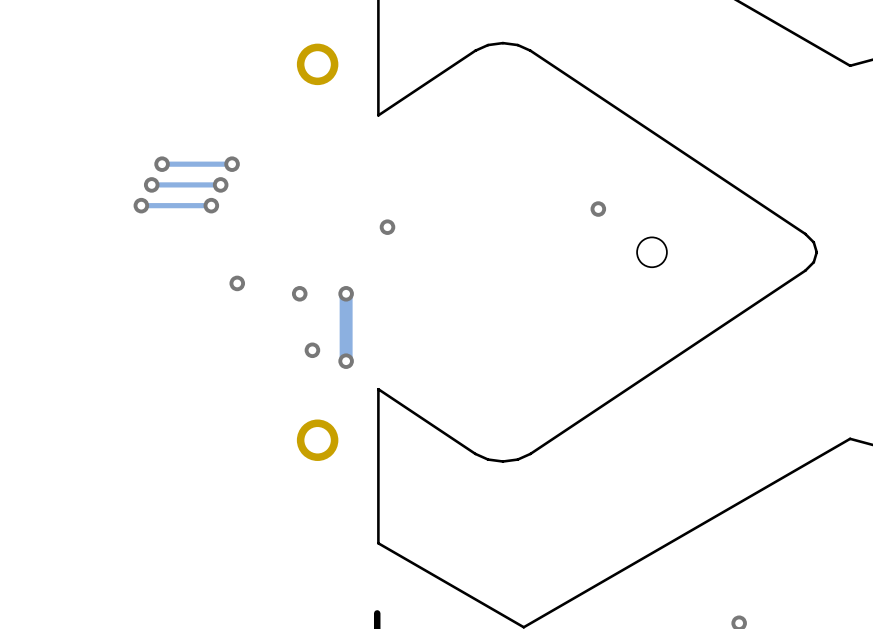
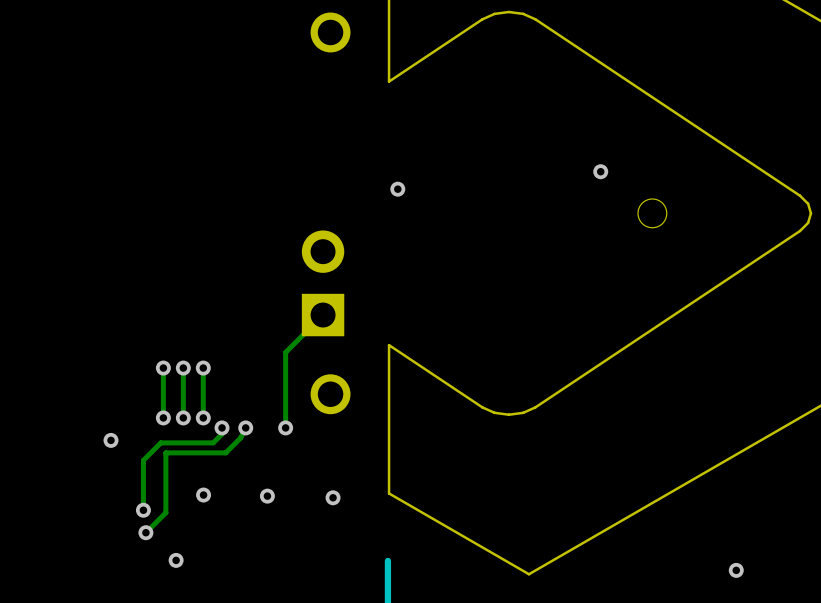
via: (162, 164) -> none
track: (232, 164) (162, 164) -> none
via: (232, 164) -> none
via: (151, 184) -> none
track: (220, 184) (151, 184) -> none
via: (220, 184) -> none
via: (141, 205) -> none
track: (209, 205) (141, 205) -> none
via: (211, 205) -> none
via: (237, 283) -> none
via: (299, 293) -> none
track: (346, 293) (346, 361) -> none
via: (346, 293) -> none
part: none -> (323, 283)
via: (312, 350) -> none
track: none -> (323, 315) (285, 352) (285, 427)
via: (346, 361) -> none
track: none -> (163, 368) (163, 417)
via: none -> (163, 368)
track: none -> (183, 368) (183, 417)
via: none -> (183, 368)
track: none -> (203, 368) (203, 417)
via: none -> (203, 368)
via: none -> (163, 417)
via: none -> (183, 417)
via: none -> (203, 417)
track: none -> (222, 427) (222, 434) (213, 442) (160, 442) (143, 460) (143, 510)
via: none -> (222, 427)
track: none -> (245, 427) (240, 437) (225, 452) (165, 452) (165, 512) (145, 532)
via: none -> (245, 427)
via: none -> (285, 427)
via: none -> (110, 440)
via: none -> (203, 495)
via: none -> (267, 496)
via: none -> (333, 497)
via: none -> (143, 510)
via: none -> (145, 532)
via: none -> (176, 560)

